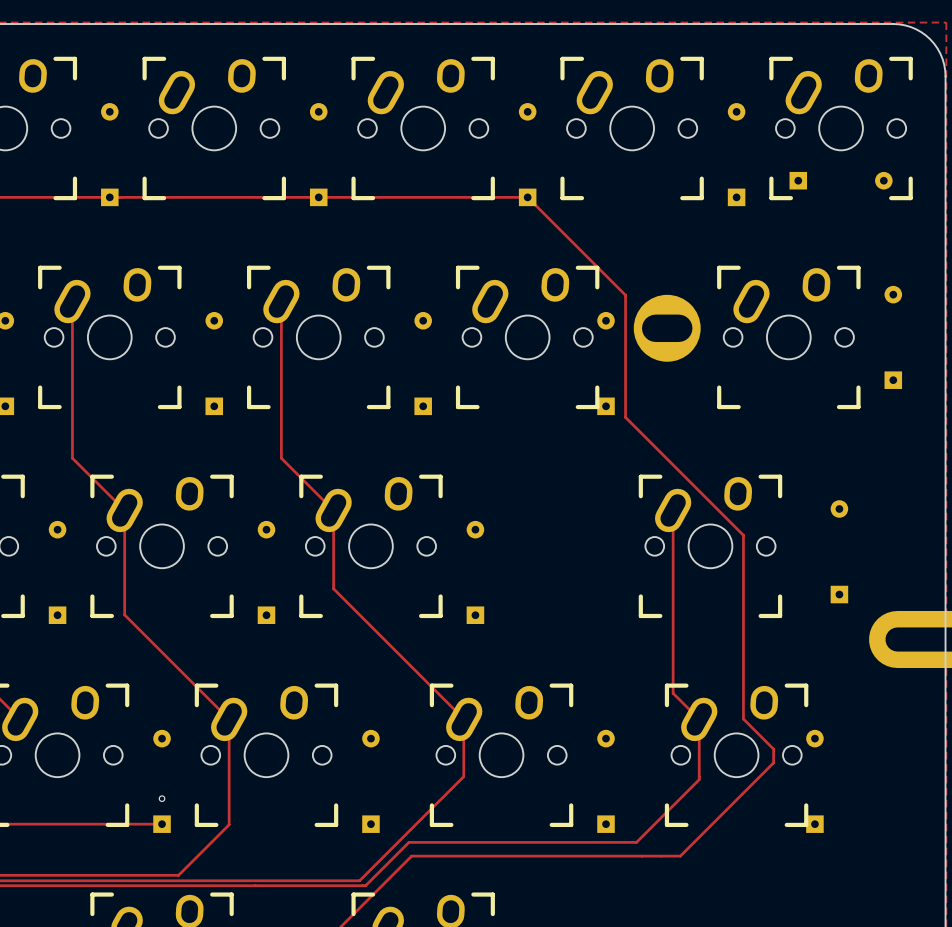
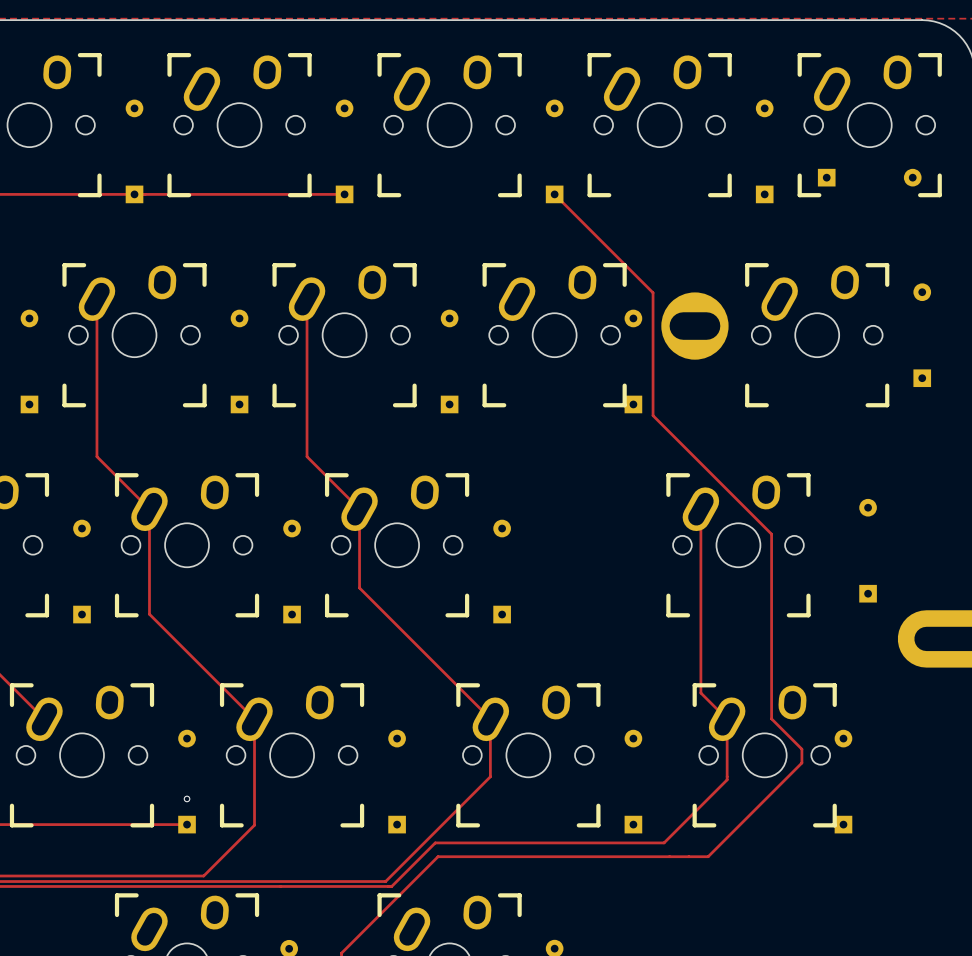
track: (318, 197) (527, 197) -> none

